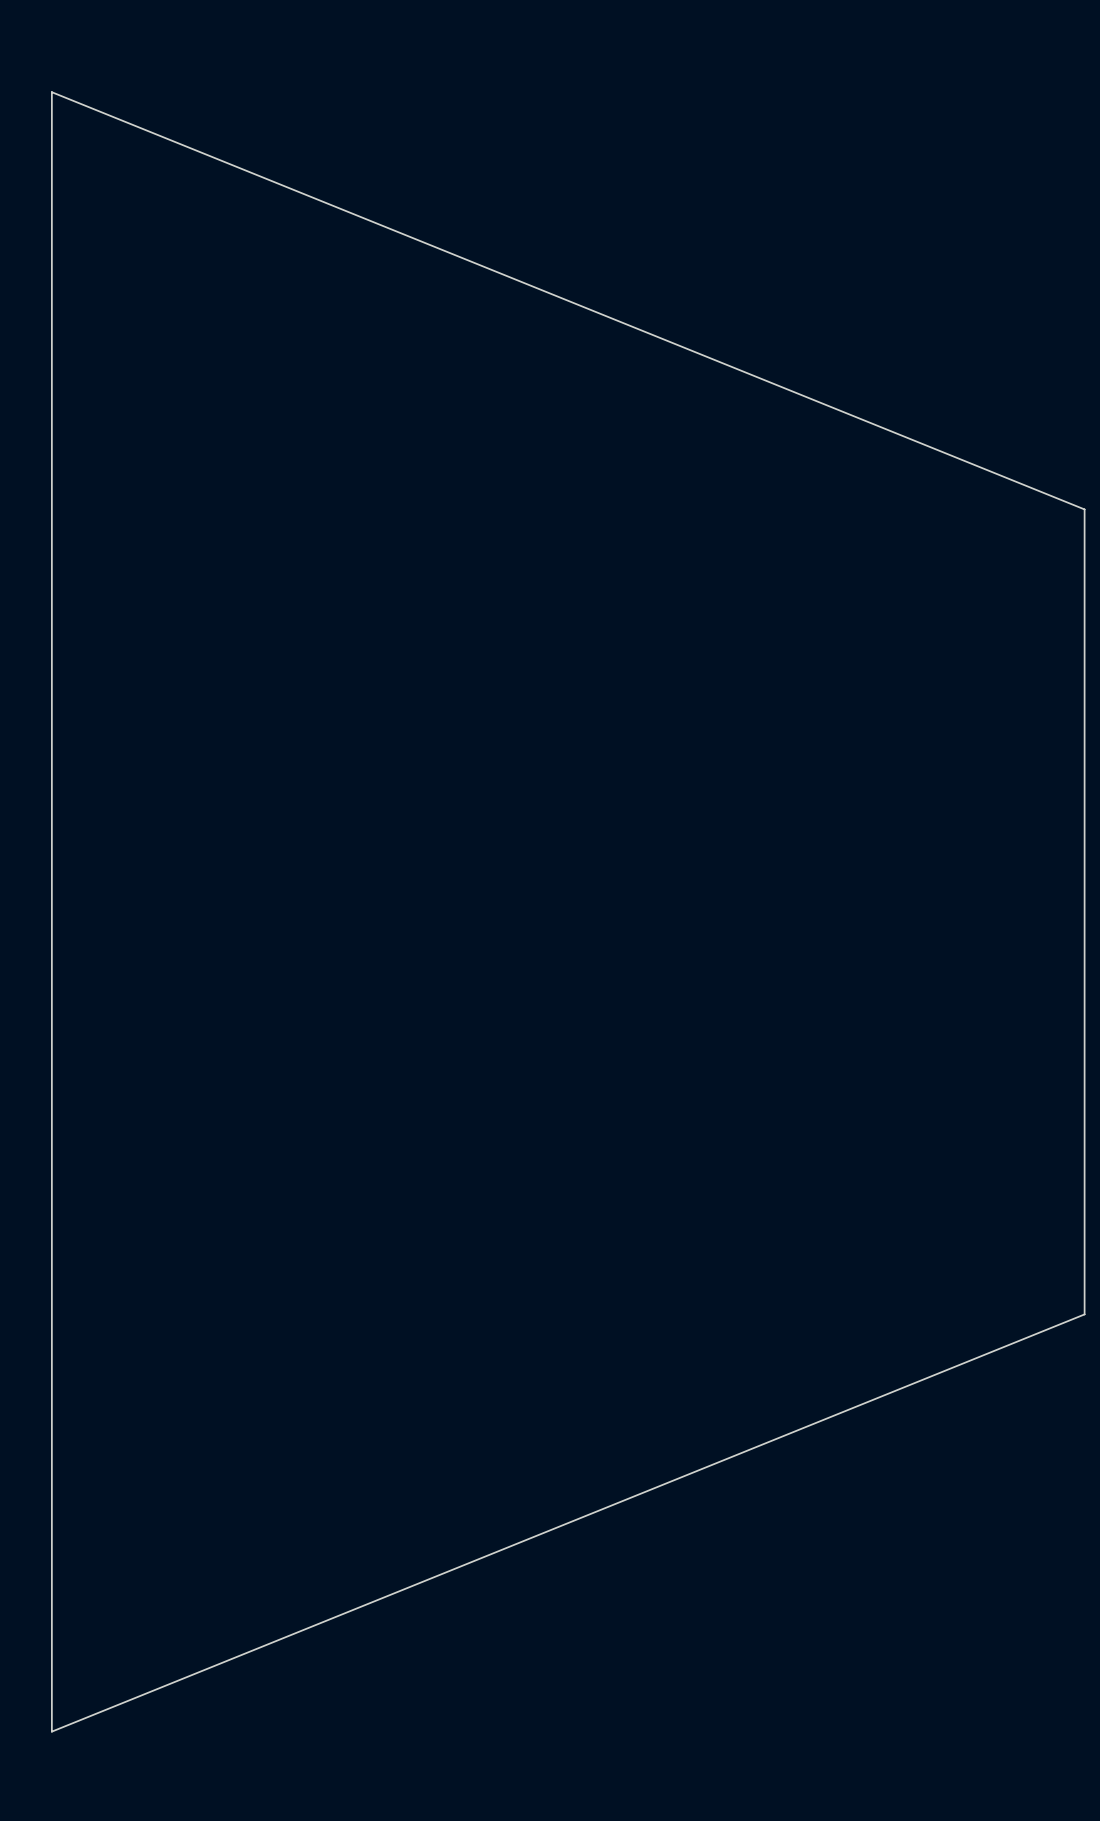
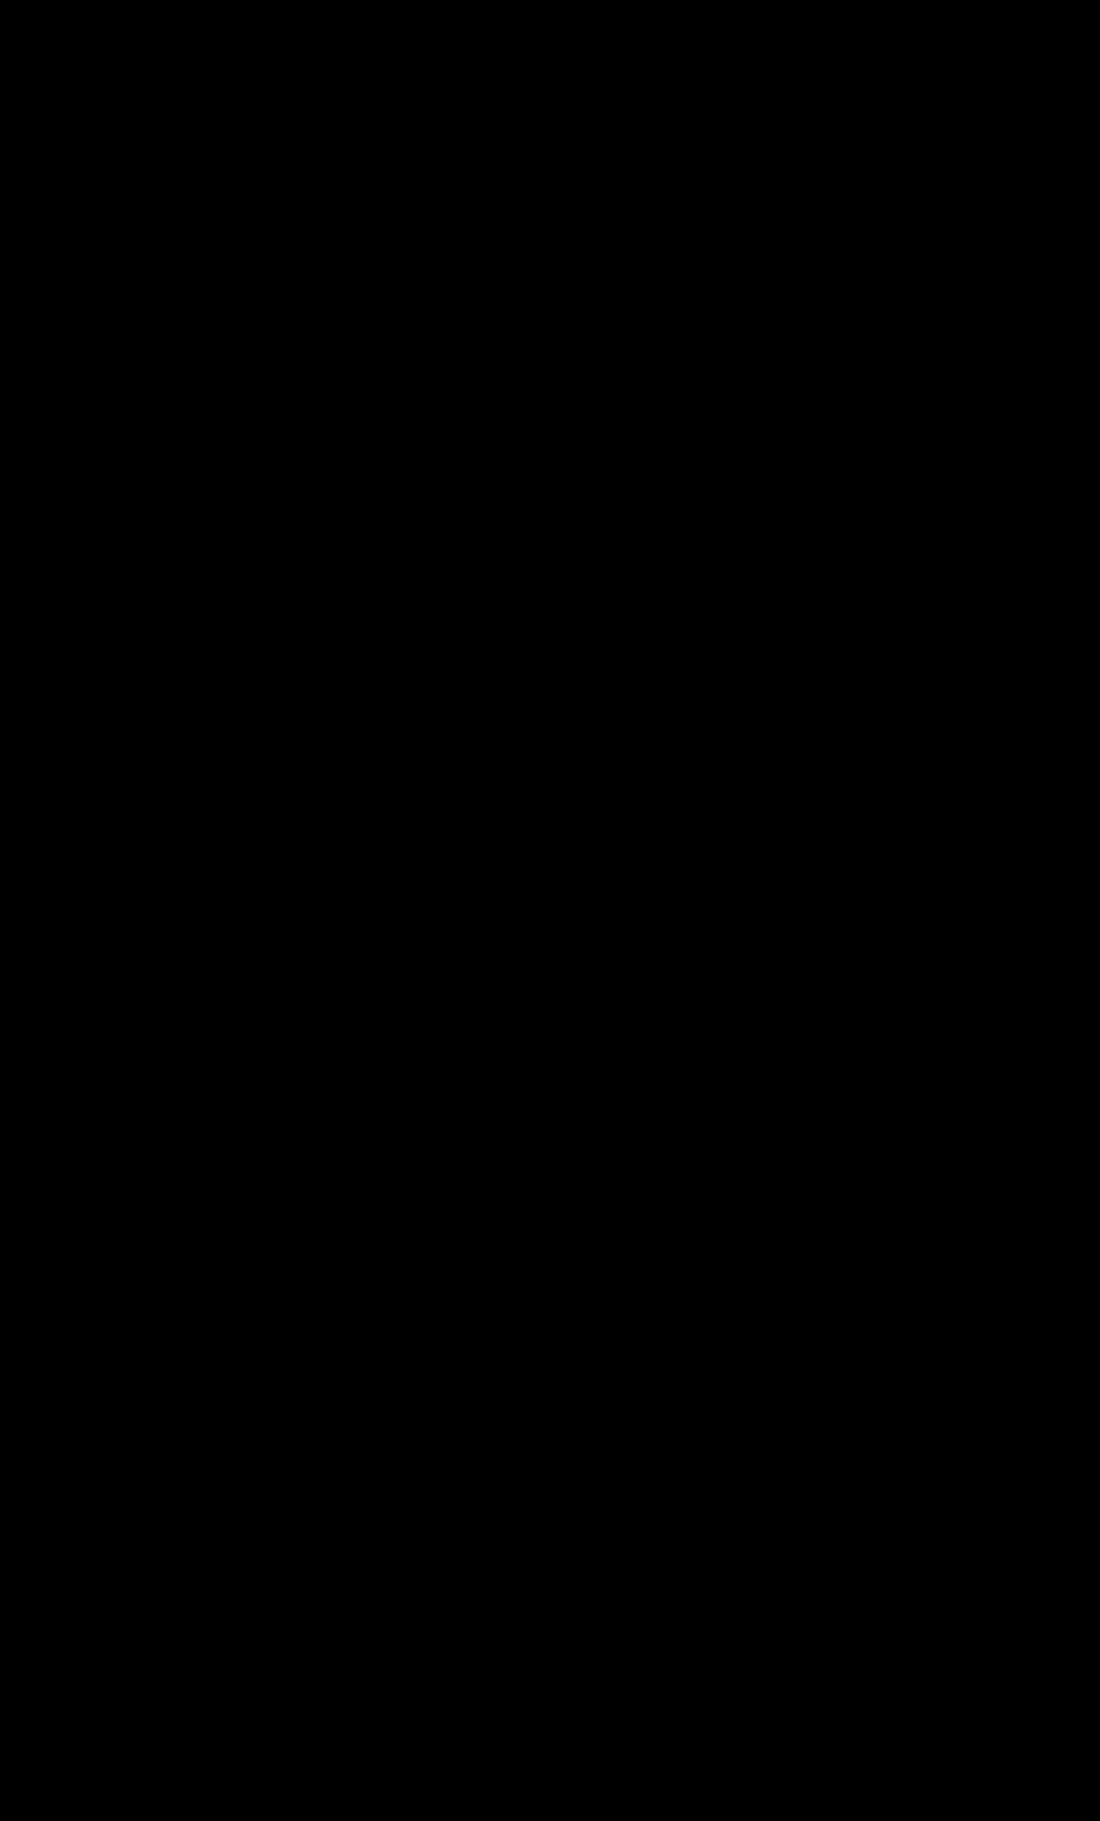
board edge: (51, 92) (51, 1731) (1084, 1314) (1084, 509) (51, 92) -> none

